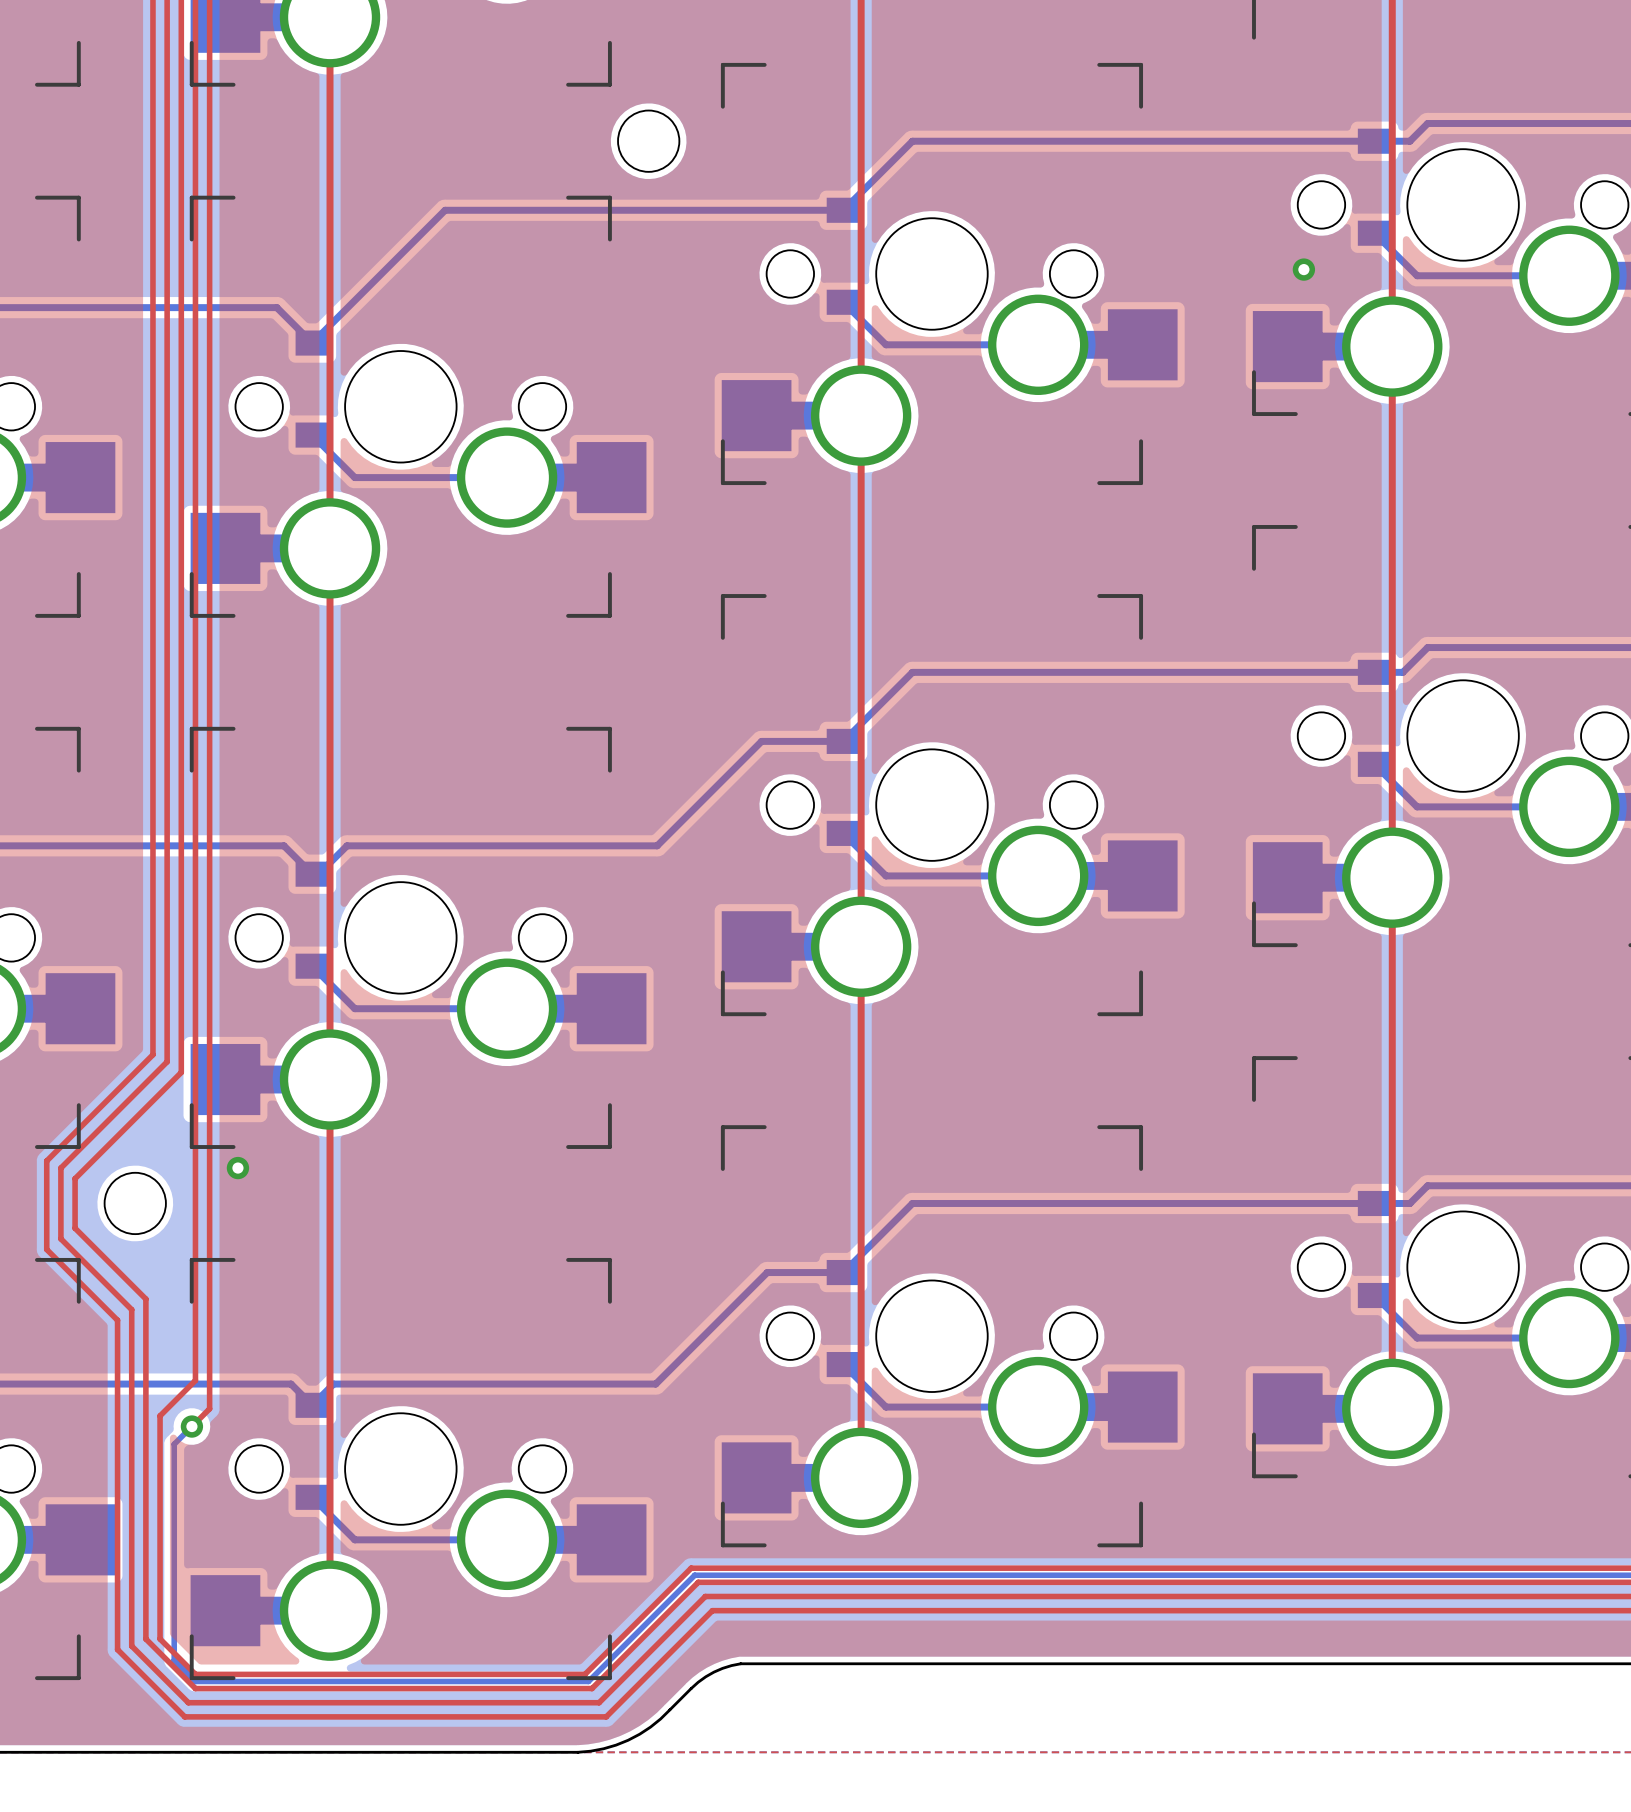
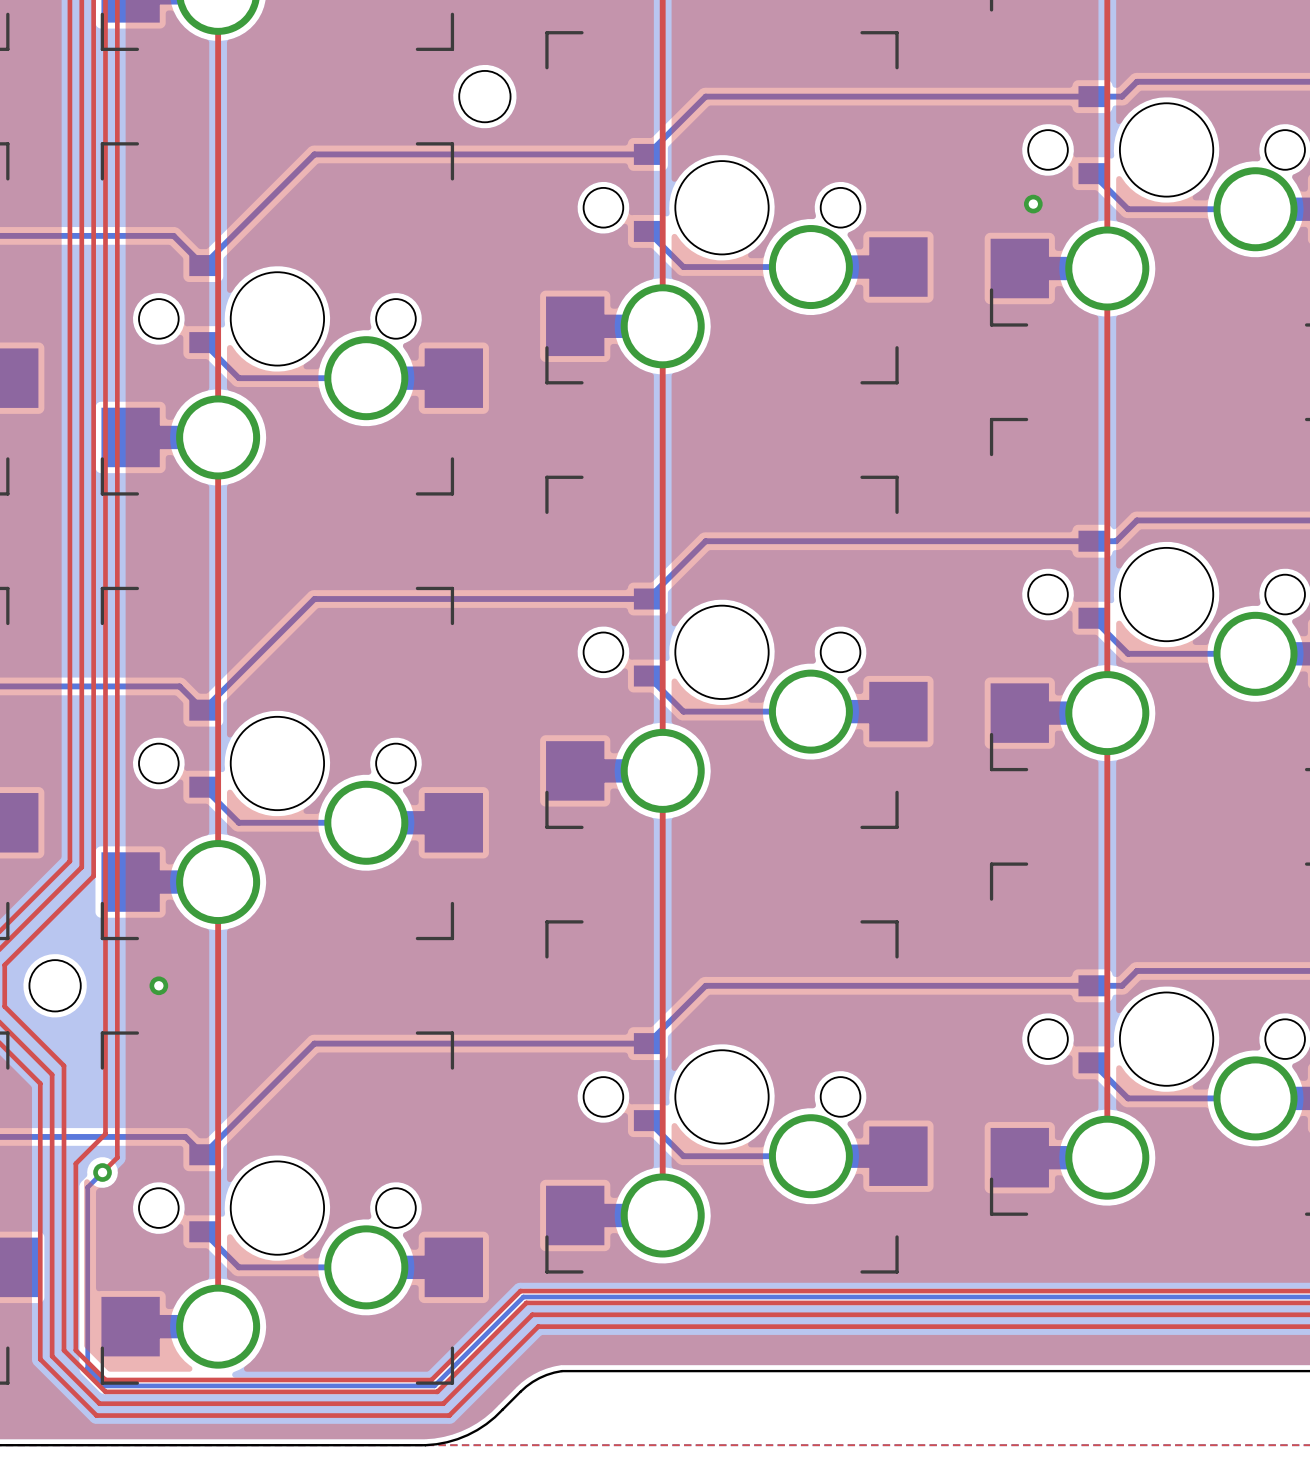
bottom track: (761, 741) (657, 845) (347, 845) (318, 874) (312, 874) -> (579, 599) (314, 599) (203, 710)
via position: (237, 1168) -> (158, 985)
bottom track: (767, 1272) (655, 1384) (333, 1384) -> (584, 1043) (314, 1043) (221, 1136)

